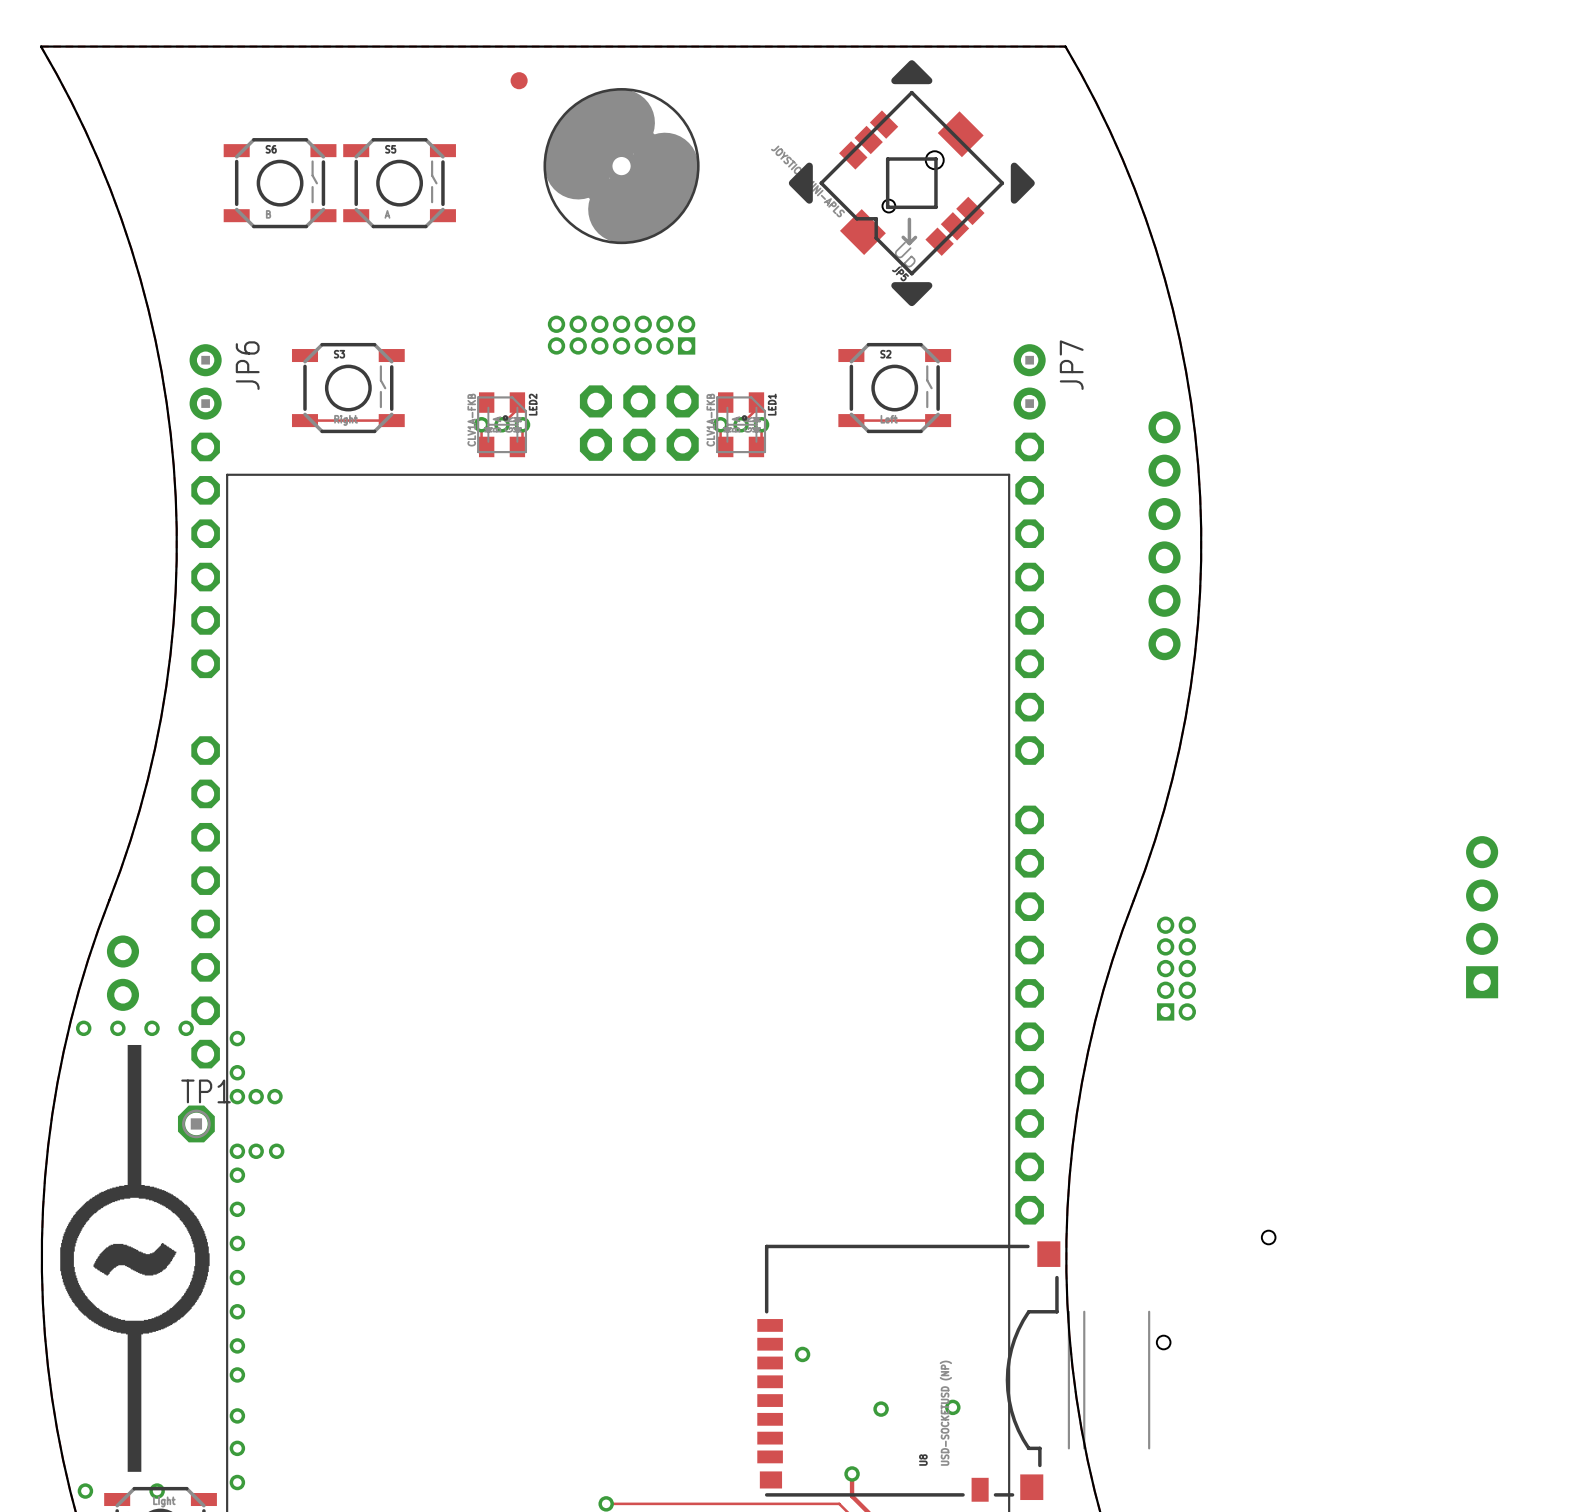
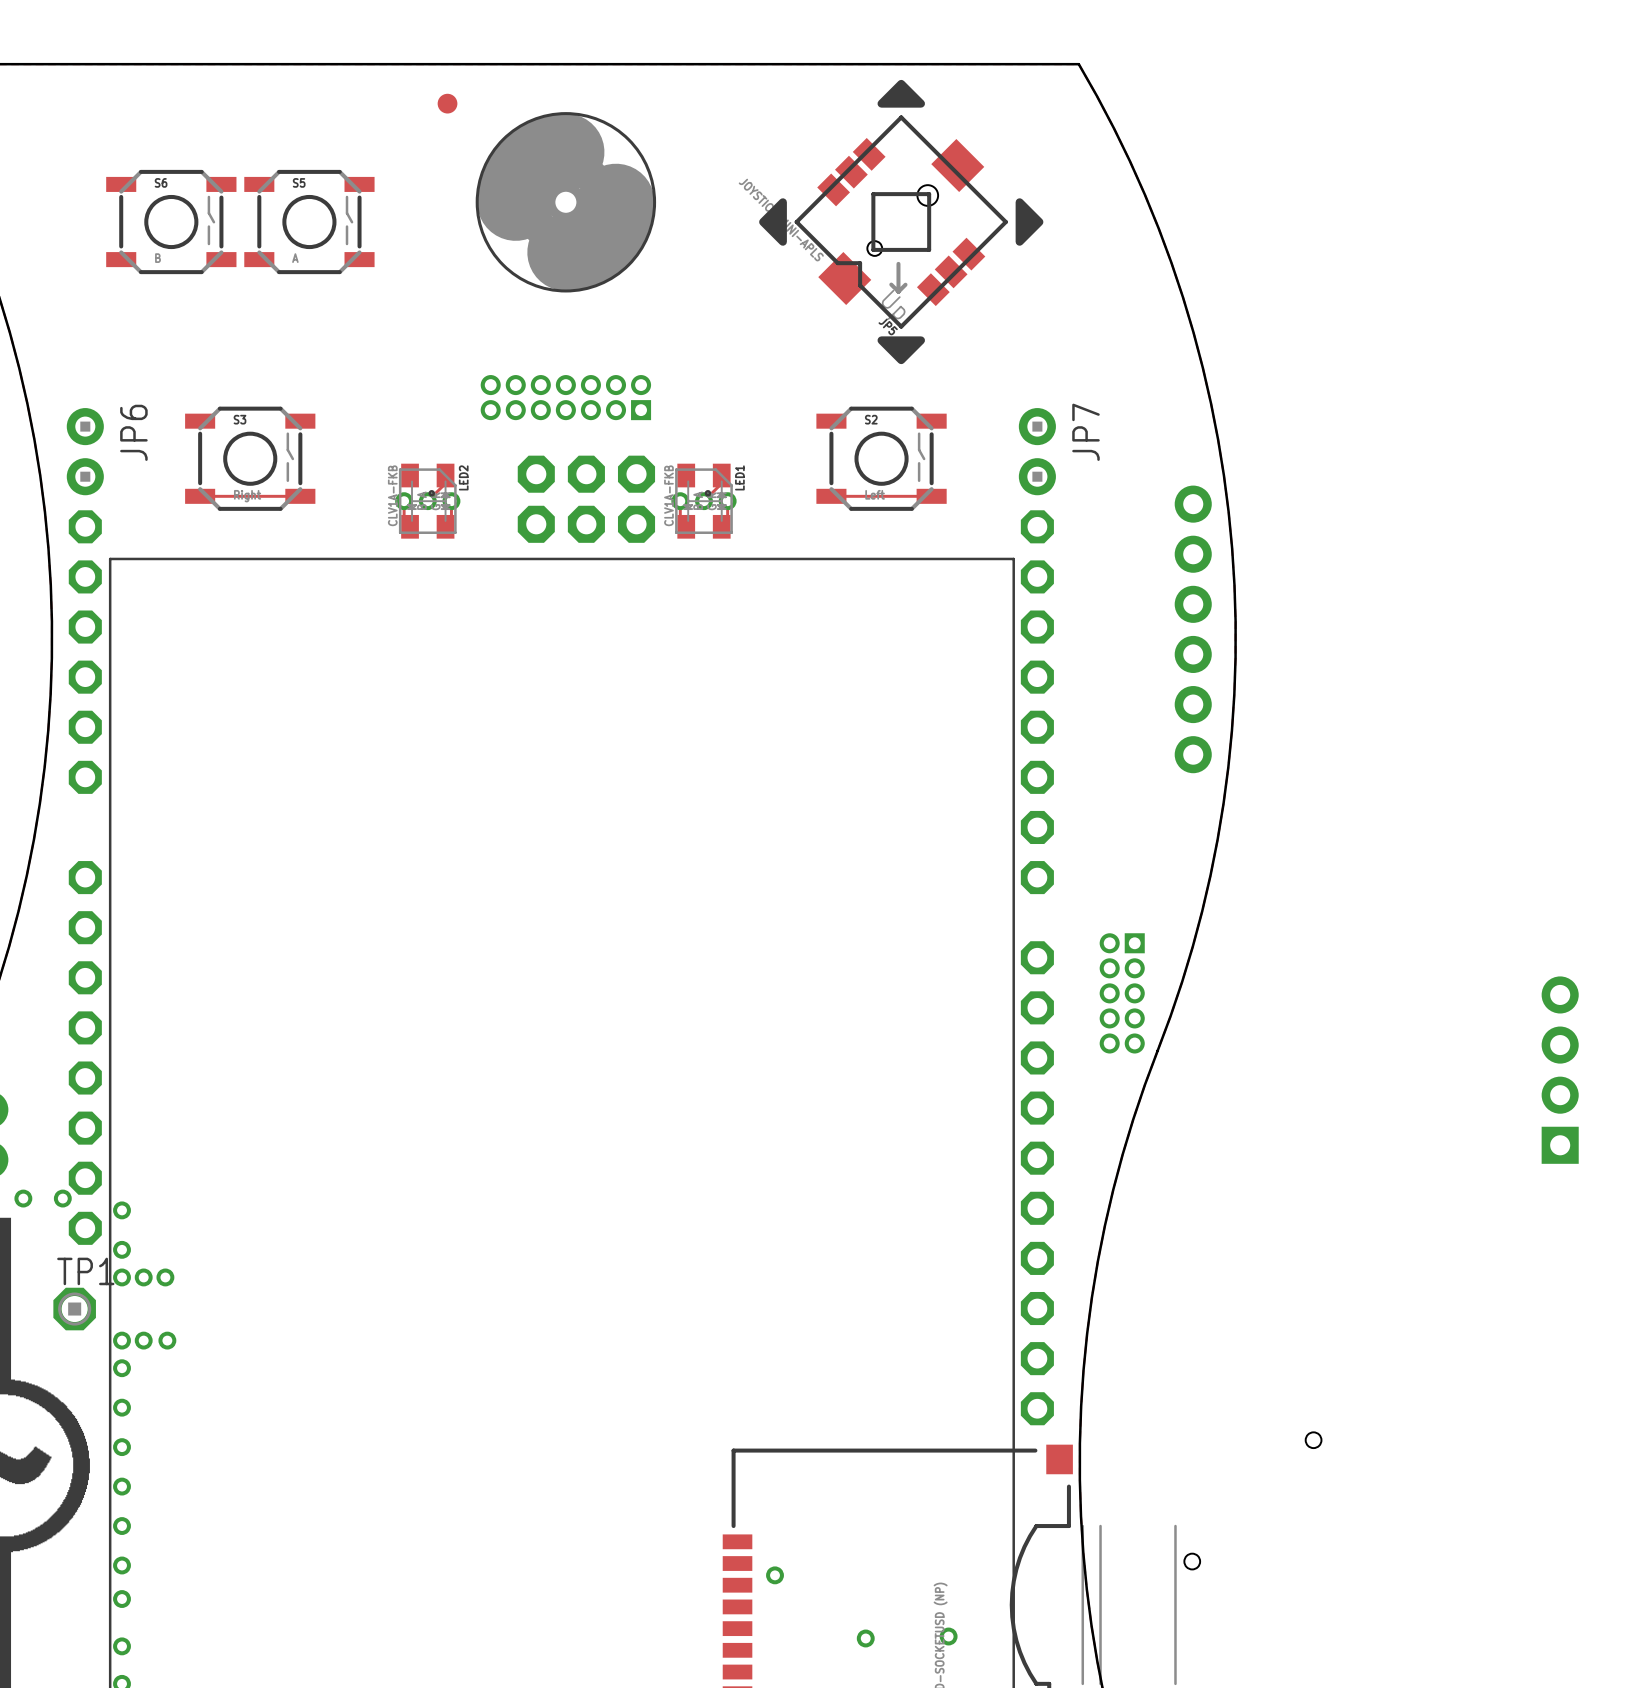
part rotation: 0° (1176, 968) -> 180° (1122, 993)
part position: (1176, 968) -> (1122, 993)

